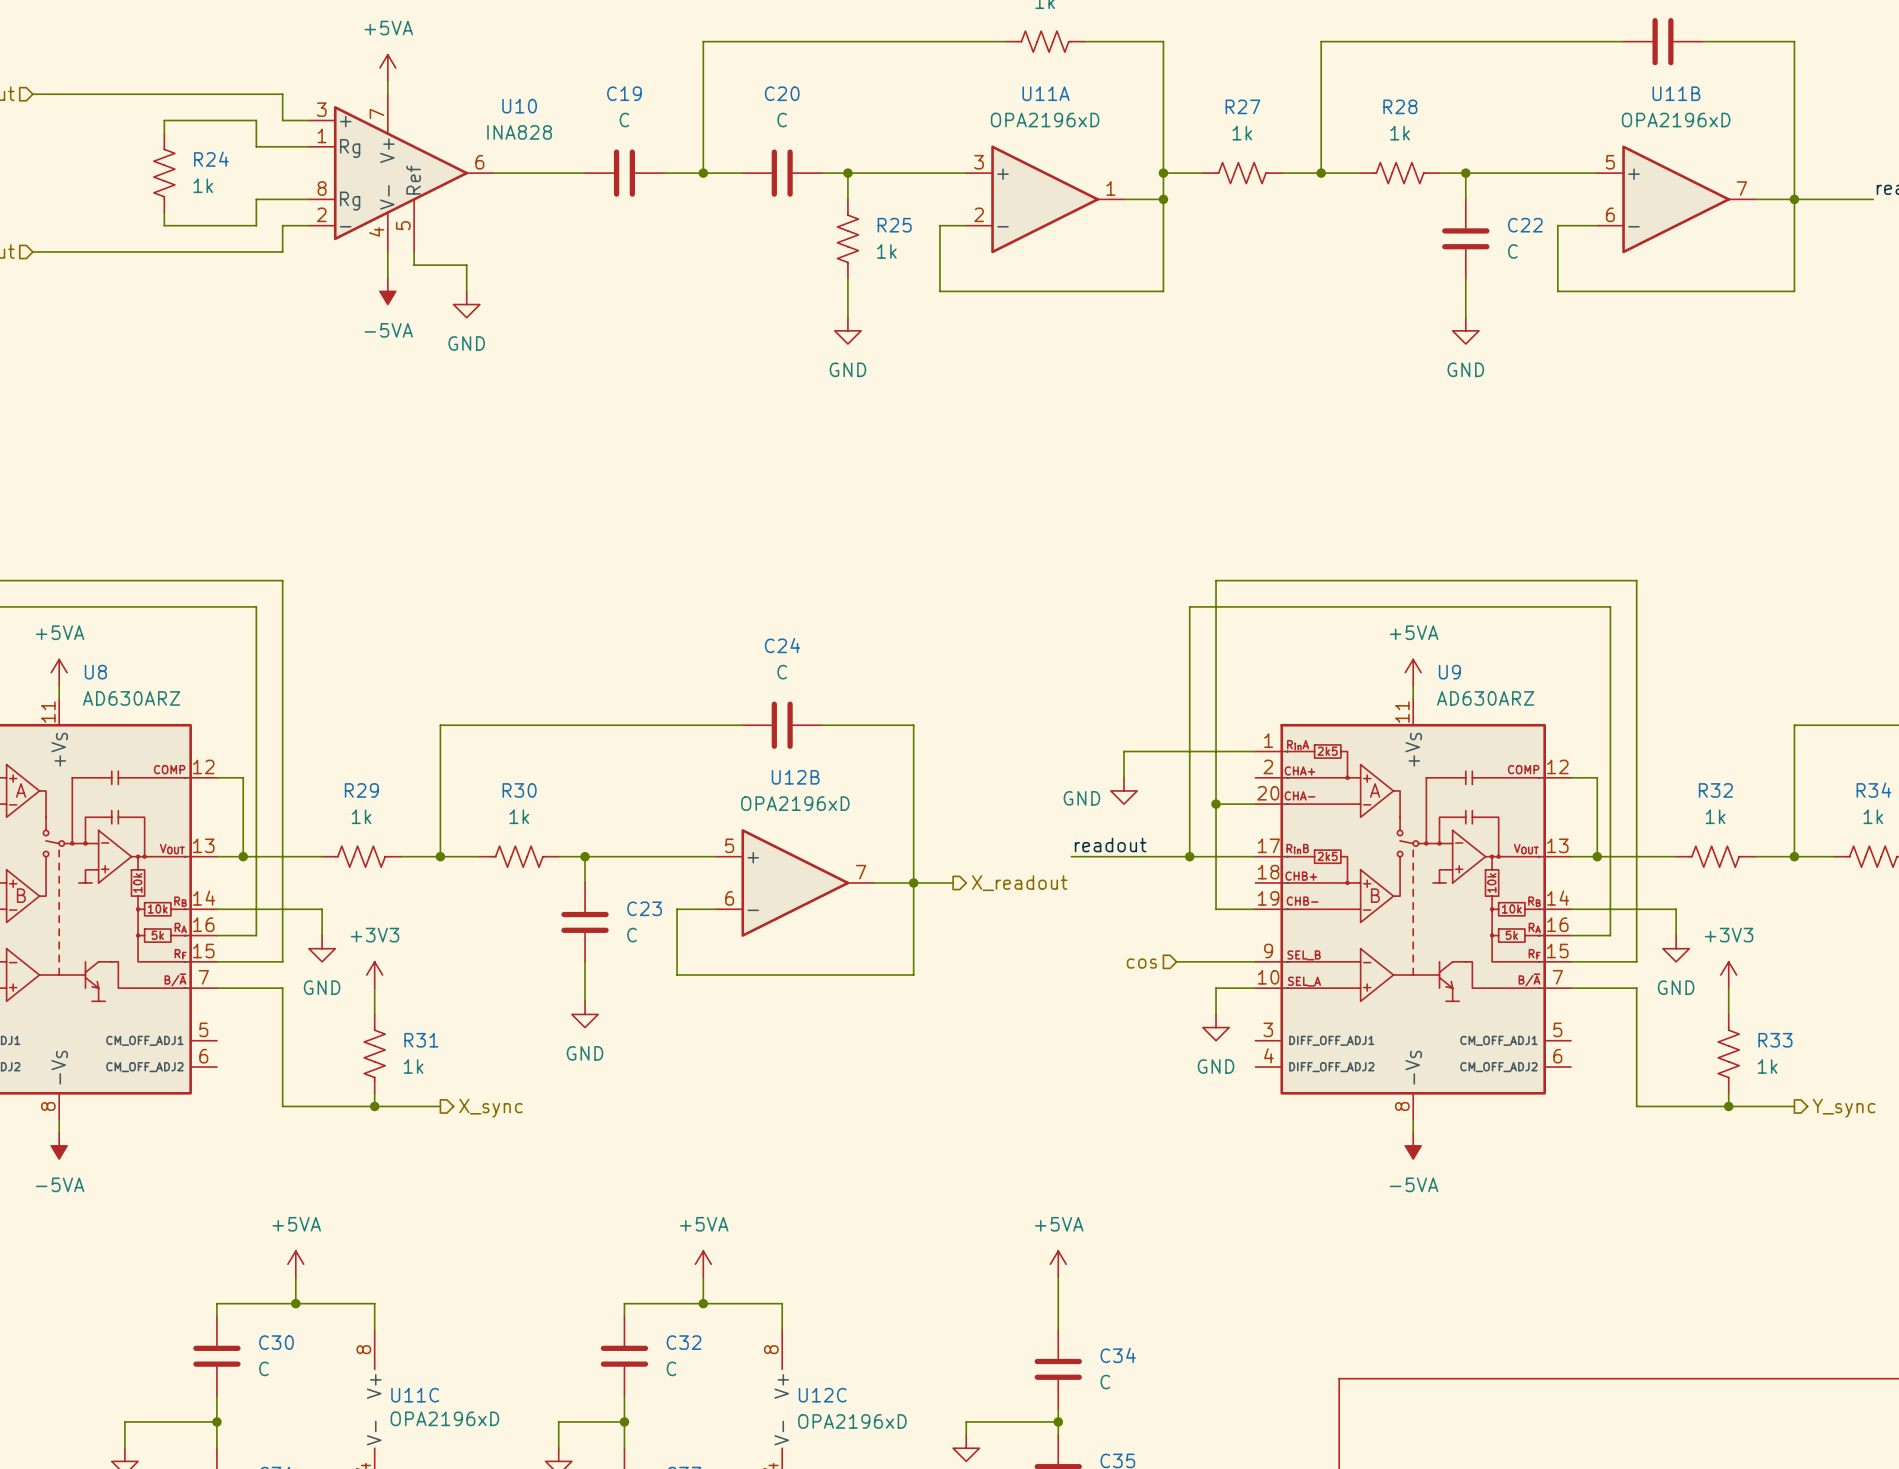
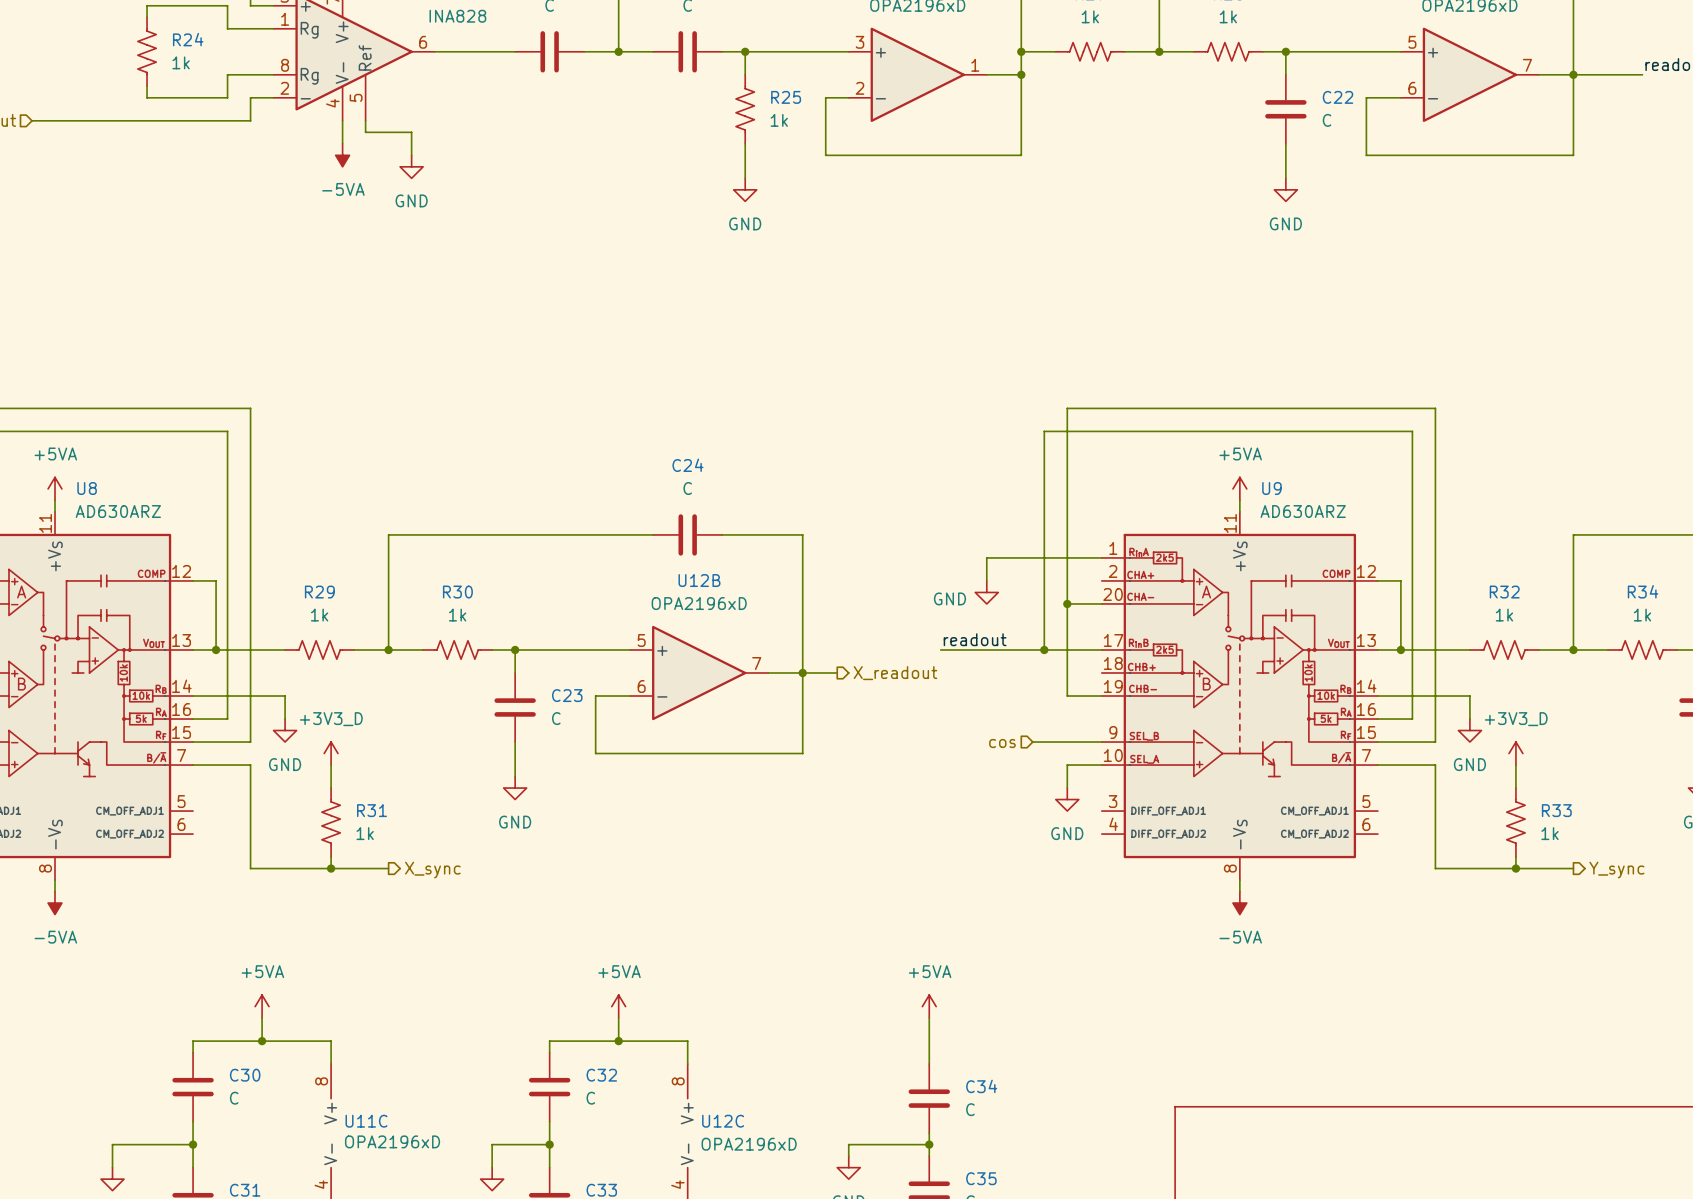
power symbol: +3V3 (374, 975) -> +3V3_D (331, 753)
power symbol: +3V3 (1728, 975) -> +3V3_D (1515, 753)

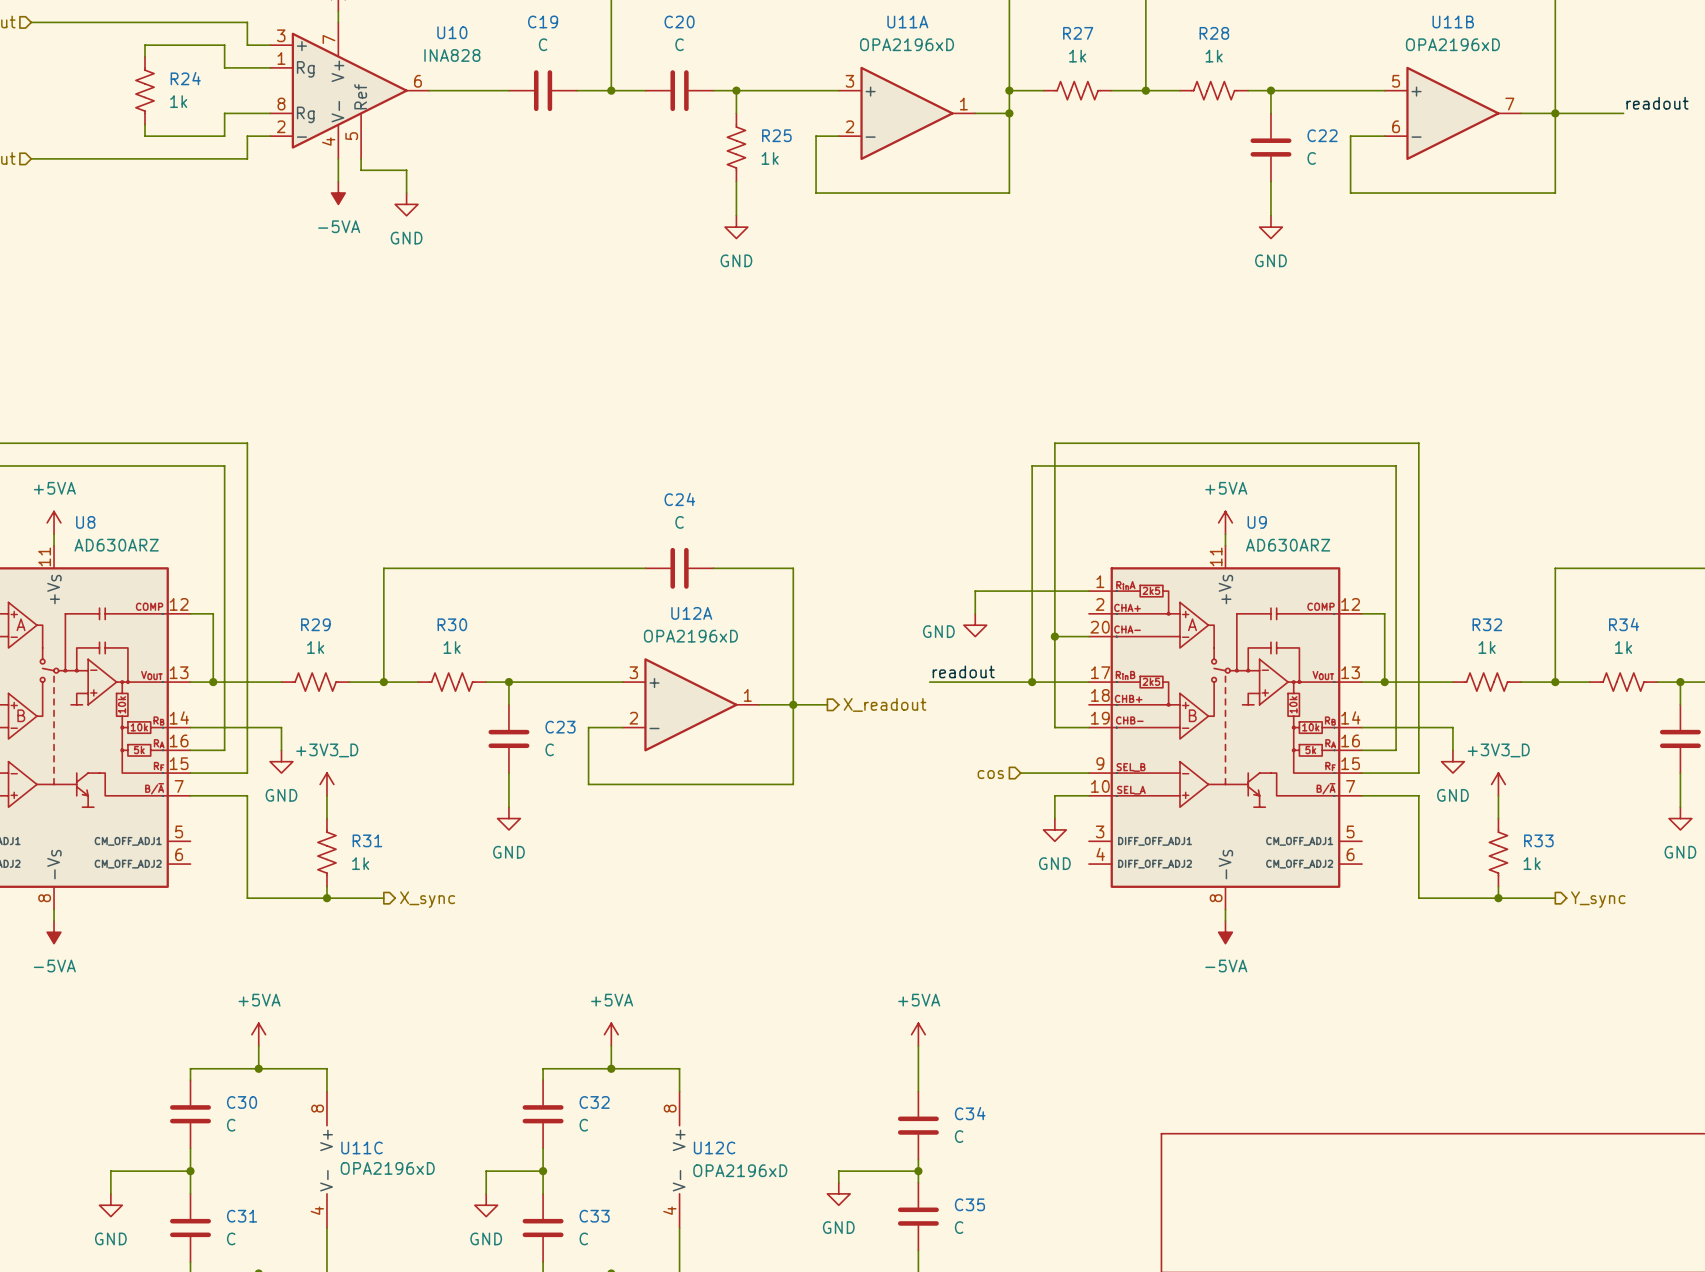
U12B name: U12B (699, 580) -> U12A (691, 613)
U12B pin number: 5 (641, 640) -> 3 (633, 672)
U12B pin number: 7 (756, 663) -> 1 (747, 695)
U12B pin number: 6 (641, 686) -> 2 (633, 718)

